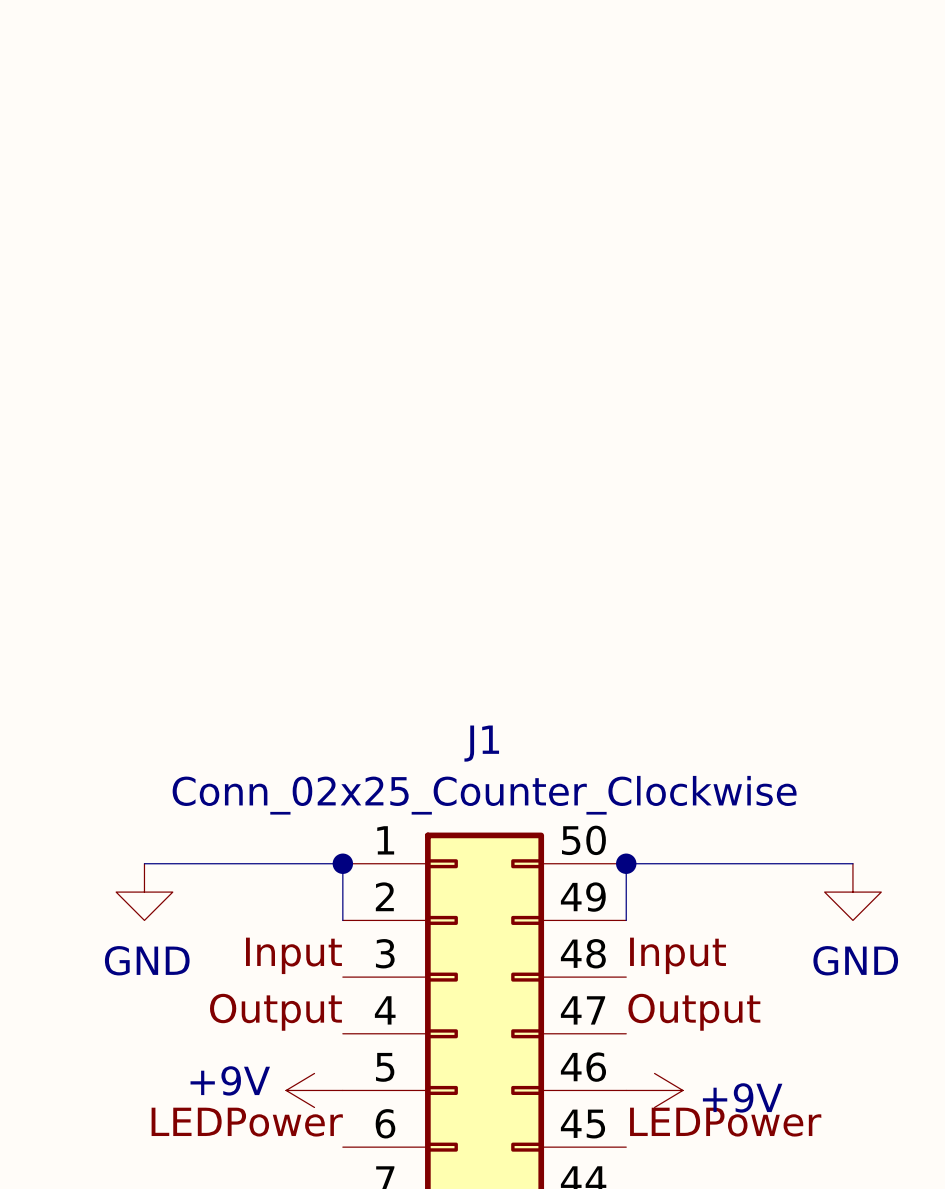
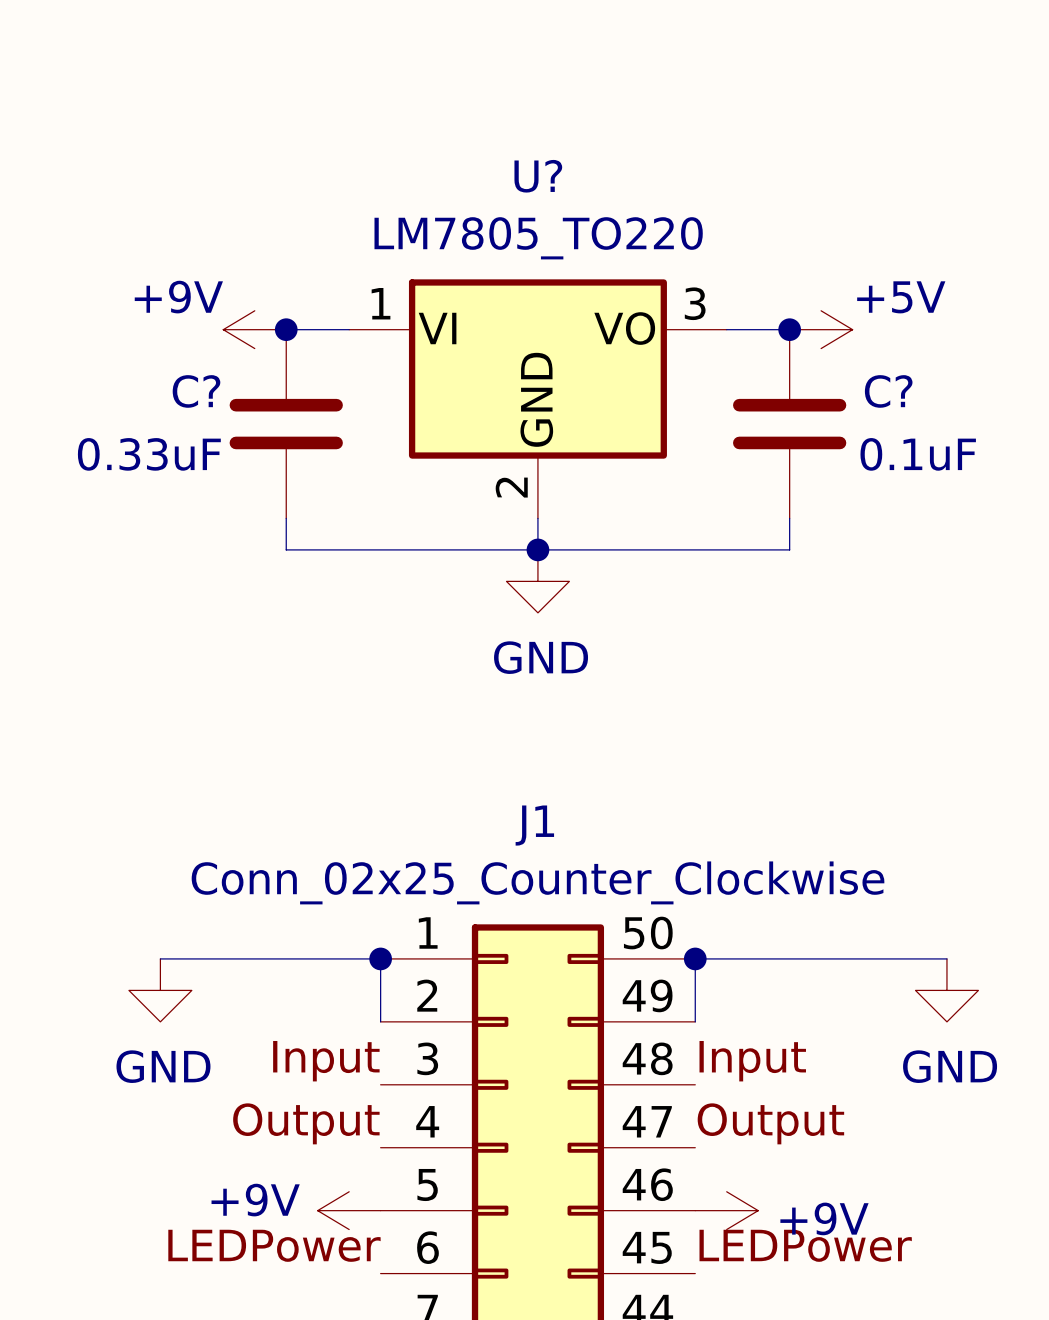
power symbol: none -> +9V (254, 329)
wire: none -> (286, 329) (349, 329)
junction: none -> (286, 329)
wire: none -> (726, 329) (789, 329)
junction: none -> (789, 329)
power symbol: none -> +5V (821, 329)
U?: none -> LM7805_TO220 (537, 398)
C?: none -> 0.33uF (286, 424)
C?: none -> 0.1uF (789, 424)
wire: none -> (286, 518) (286, 549) (789, 549) (789, 518)
wire: none -> (537, 518) (537, 549)
junction: none -> (537, 549)
power symbol: none -> GND (537, 581)

